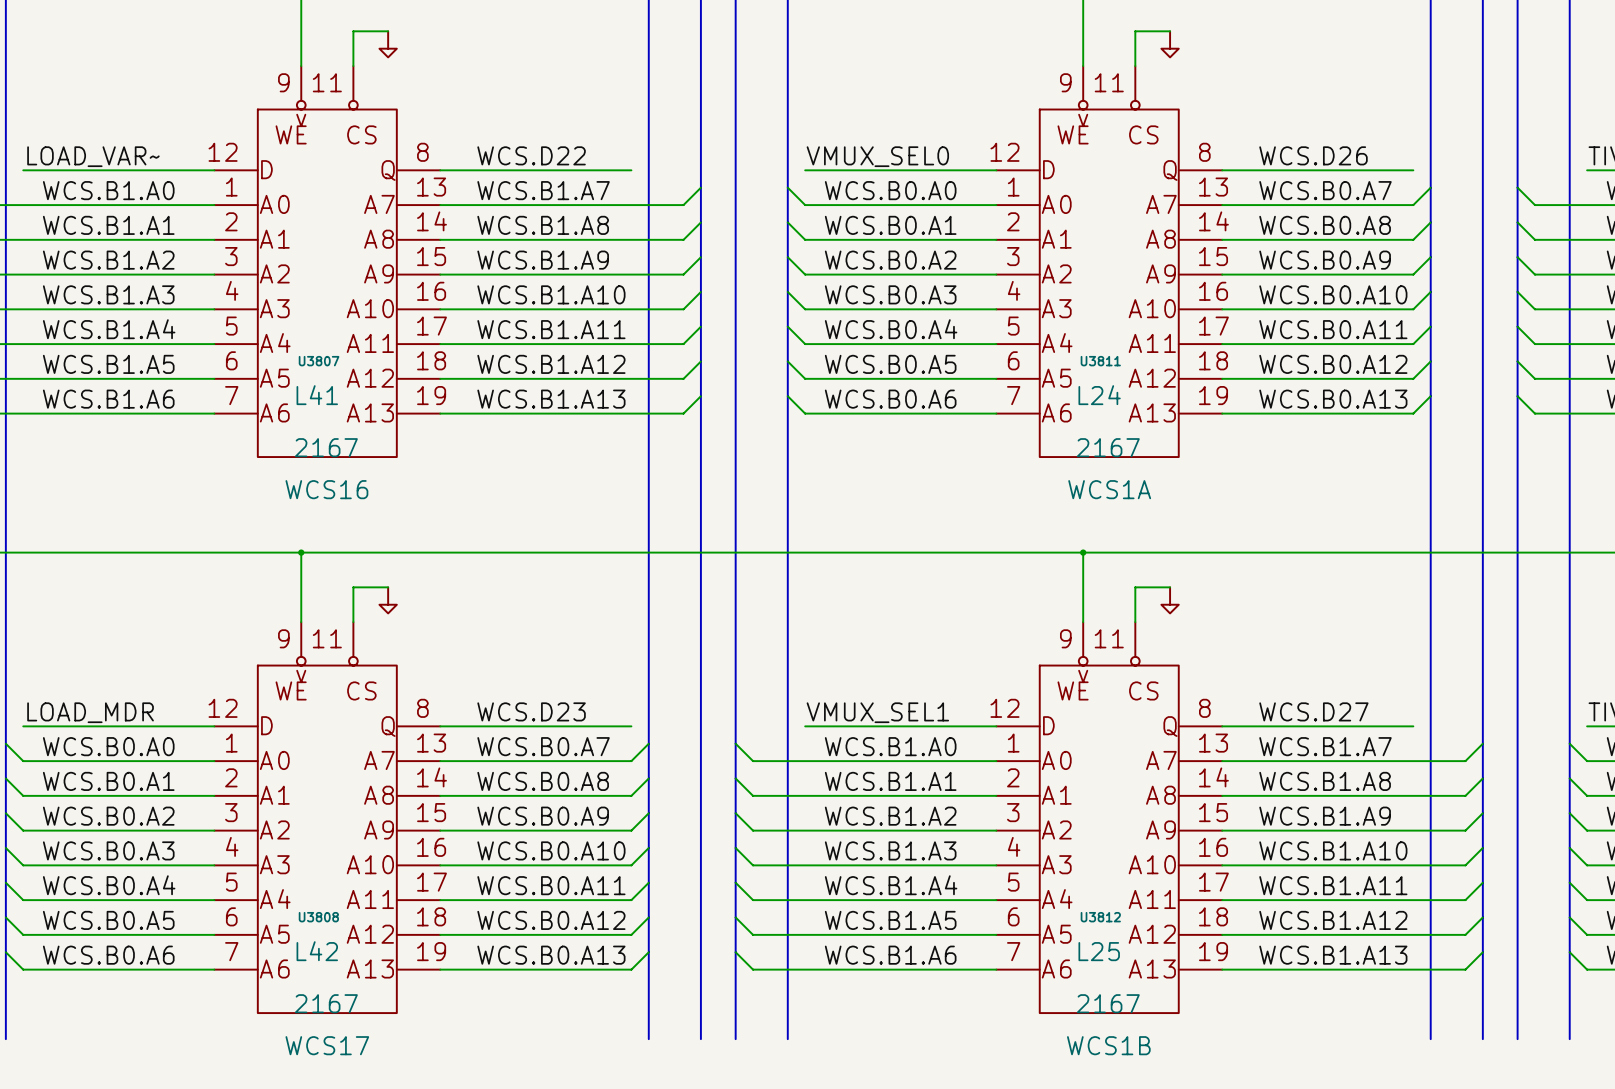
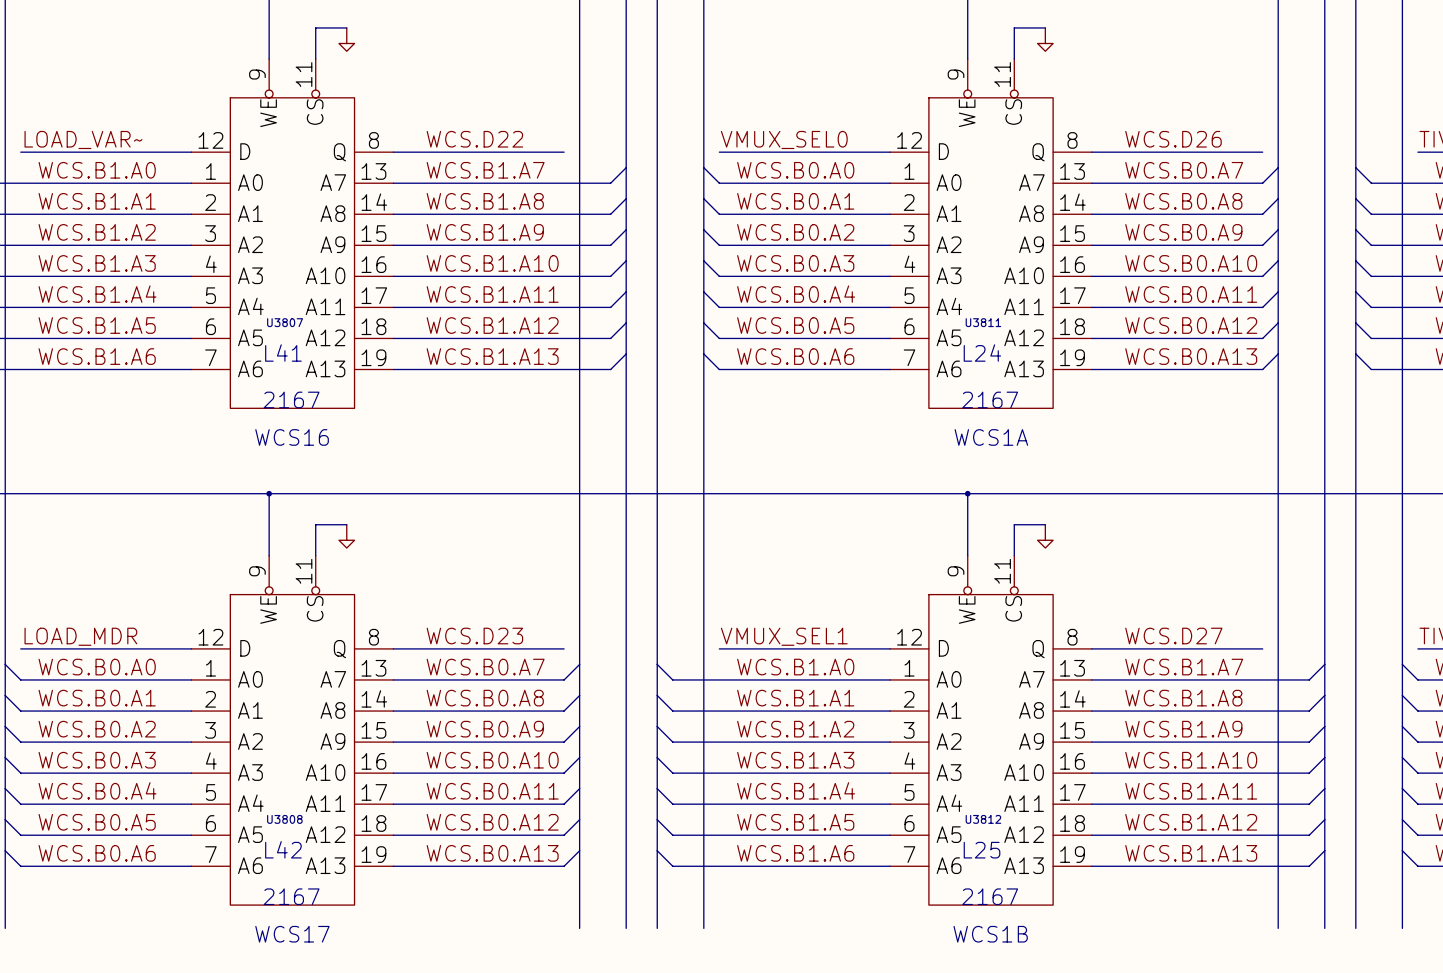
U3807 symbol: [214, 66, 441, 458] -> [191, 59, 394, 409]
U3811 symbol: [996, 66, 1223, 458] -> [890, 59, 1092, 409]
U3808 symbol: [214, 622, 441, 1014] -> [191, 555, 394, 906]
U3812 symbol: [996, 622, 1223, 1014] -> [890, 555, 1092, 906]

